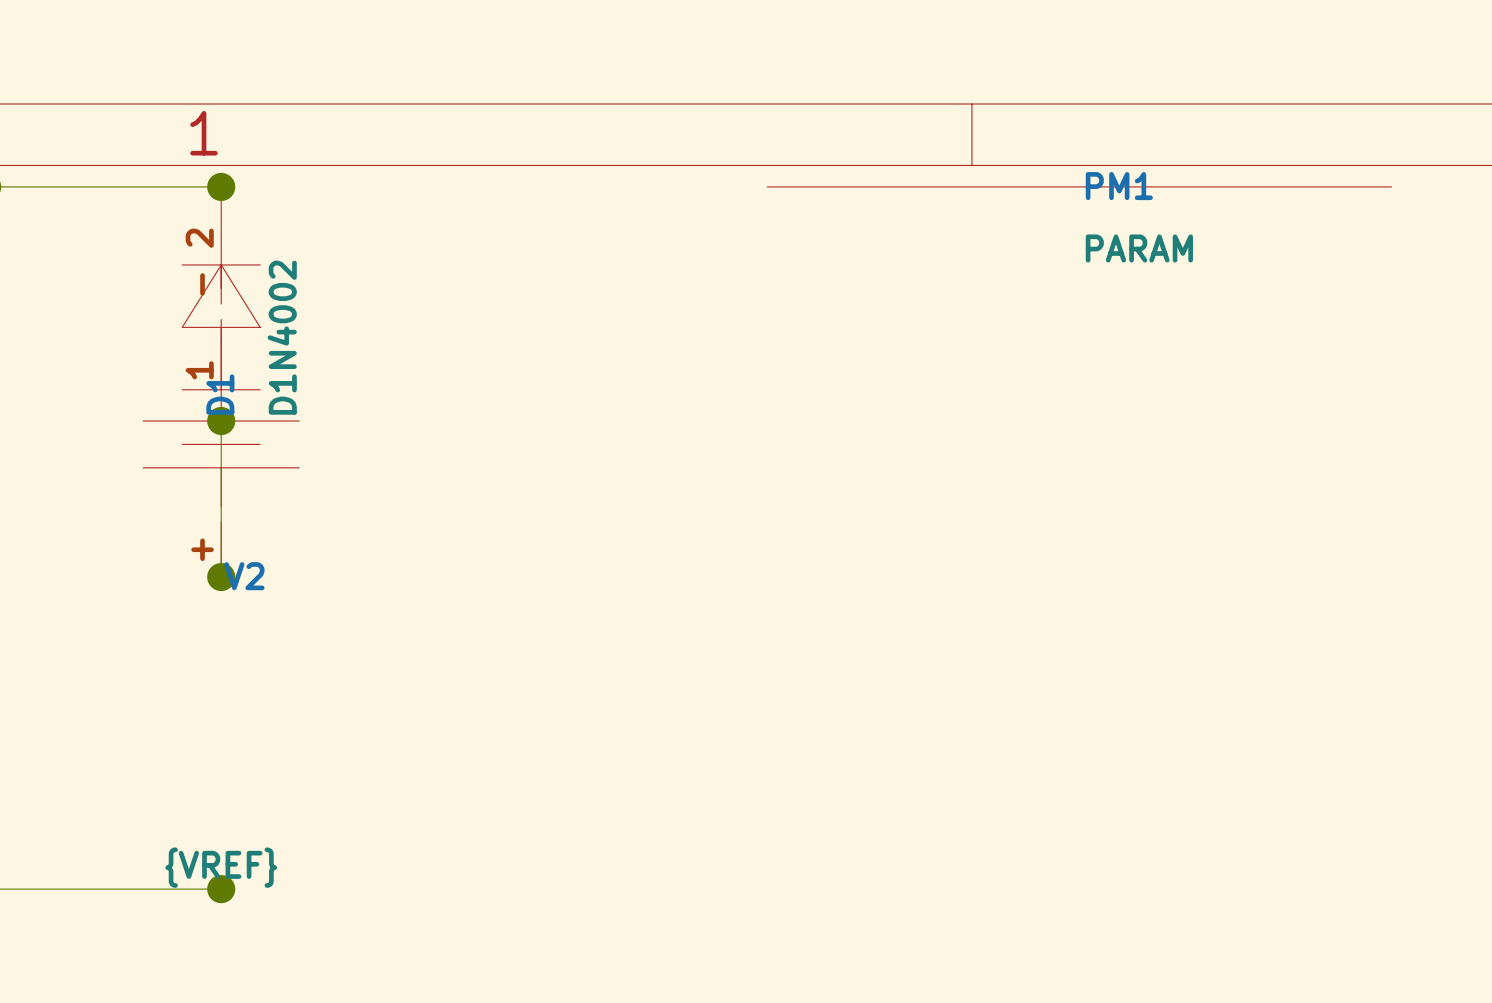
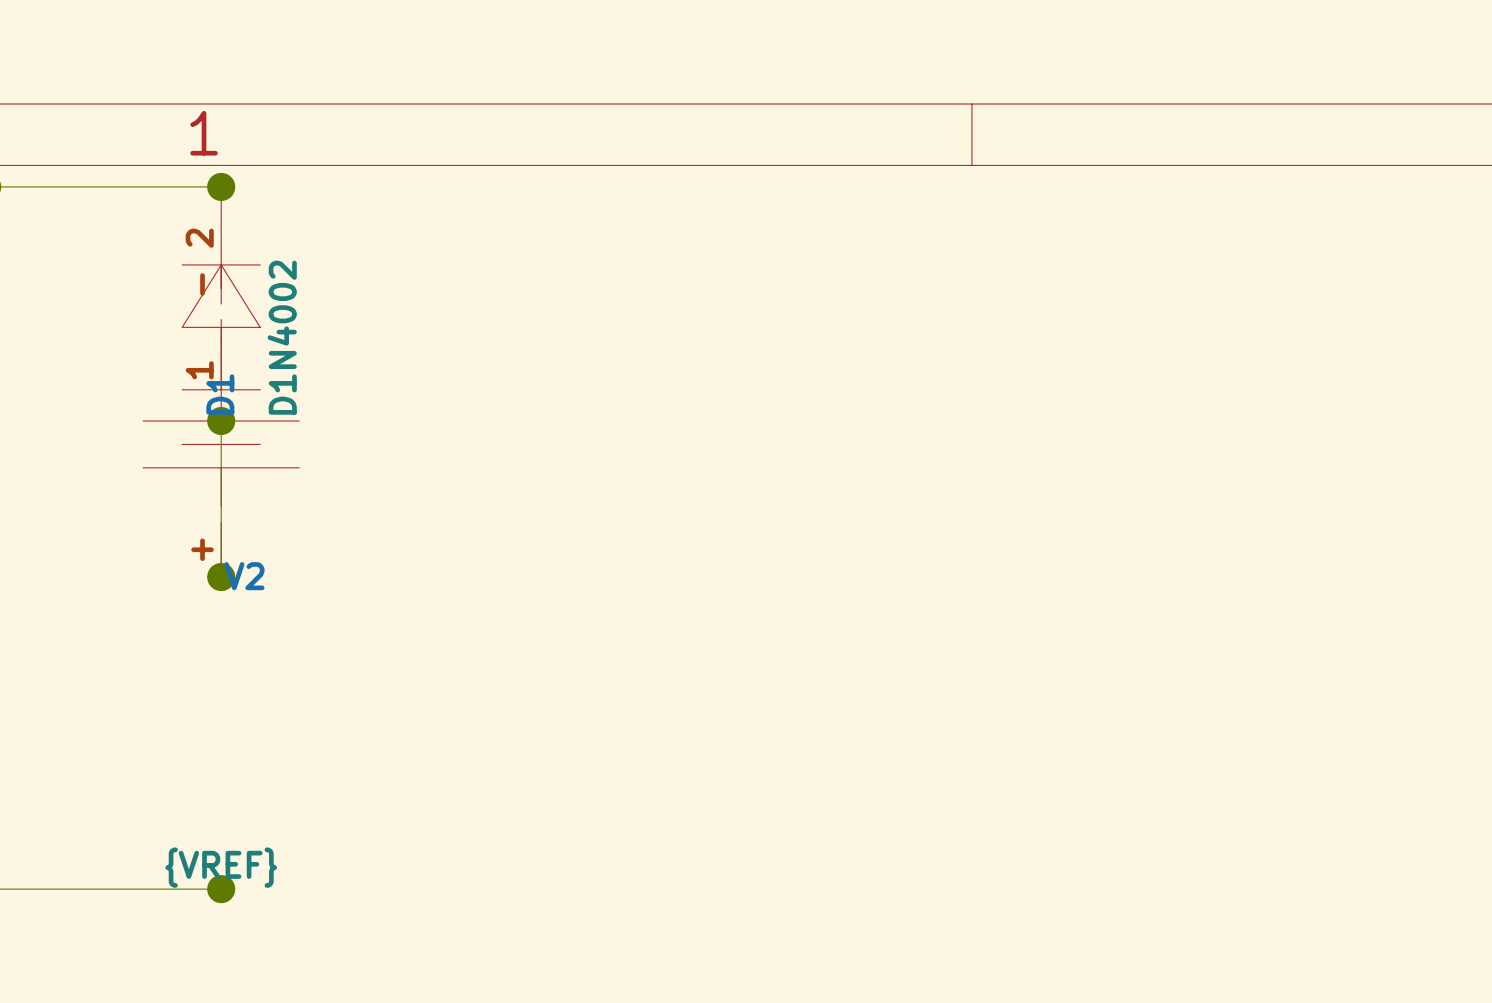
PM1: PARAM (1079, 186) -> none

